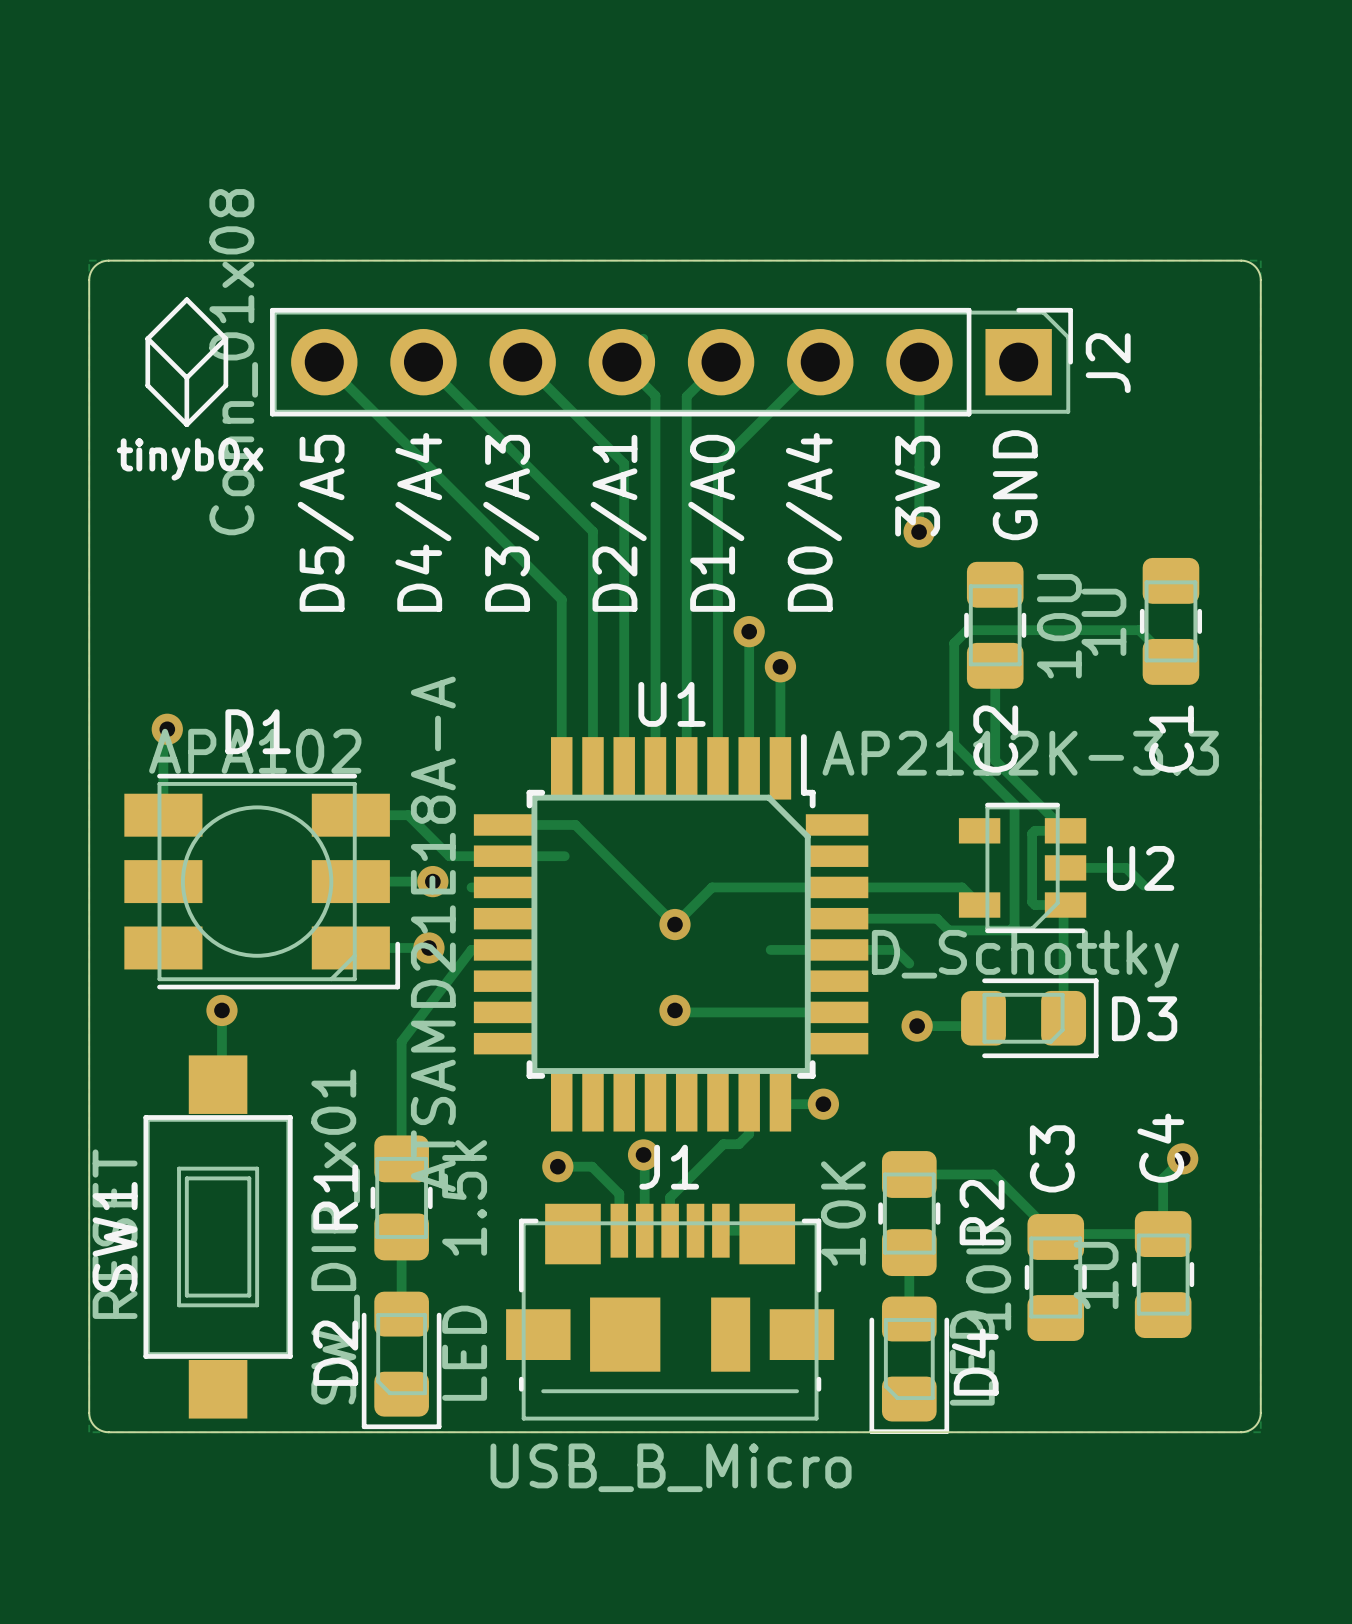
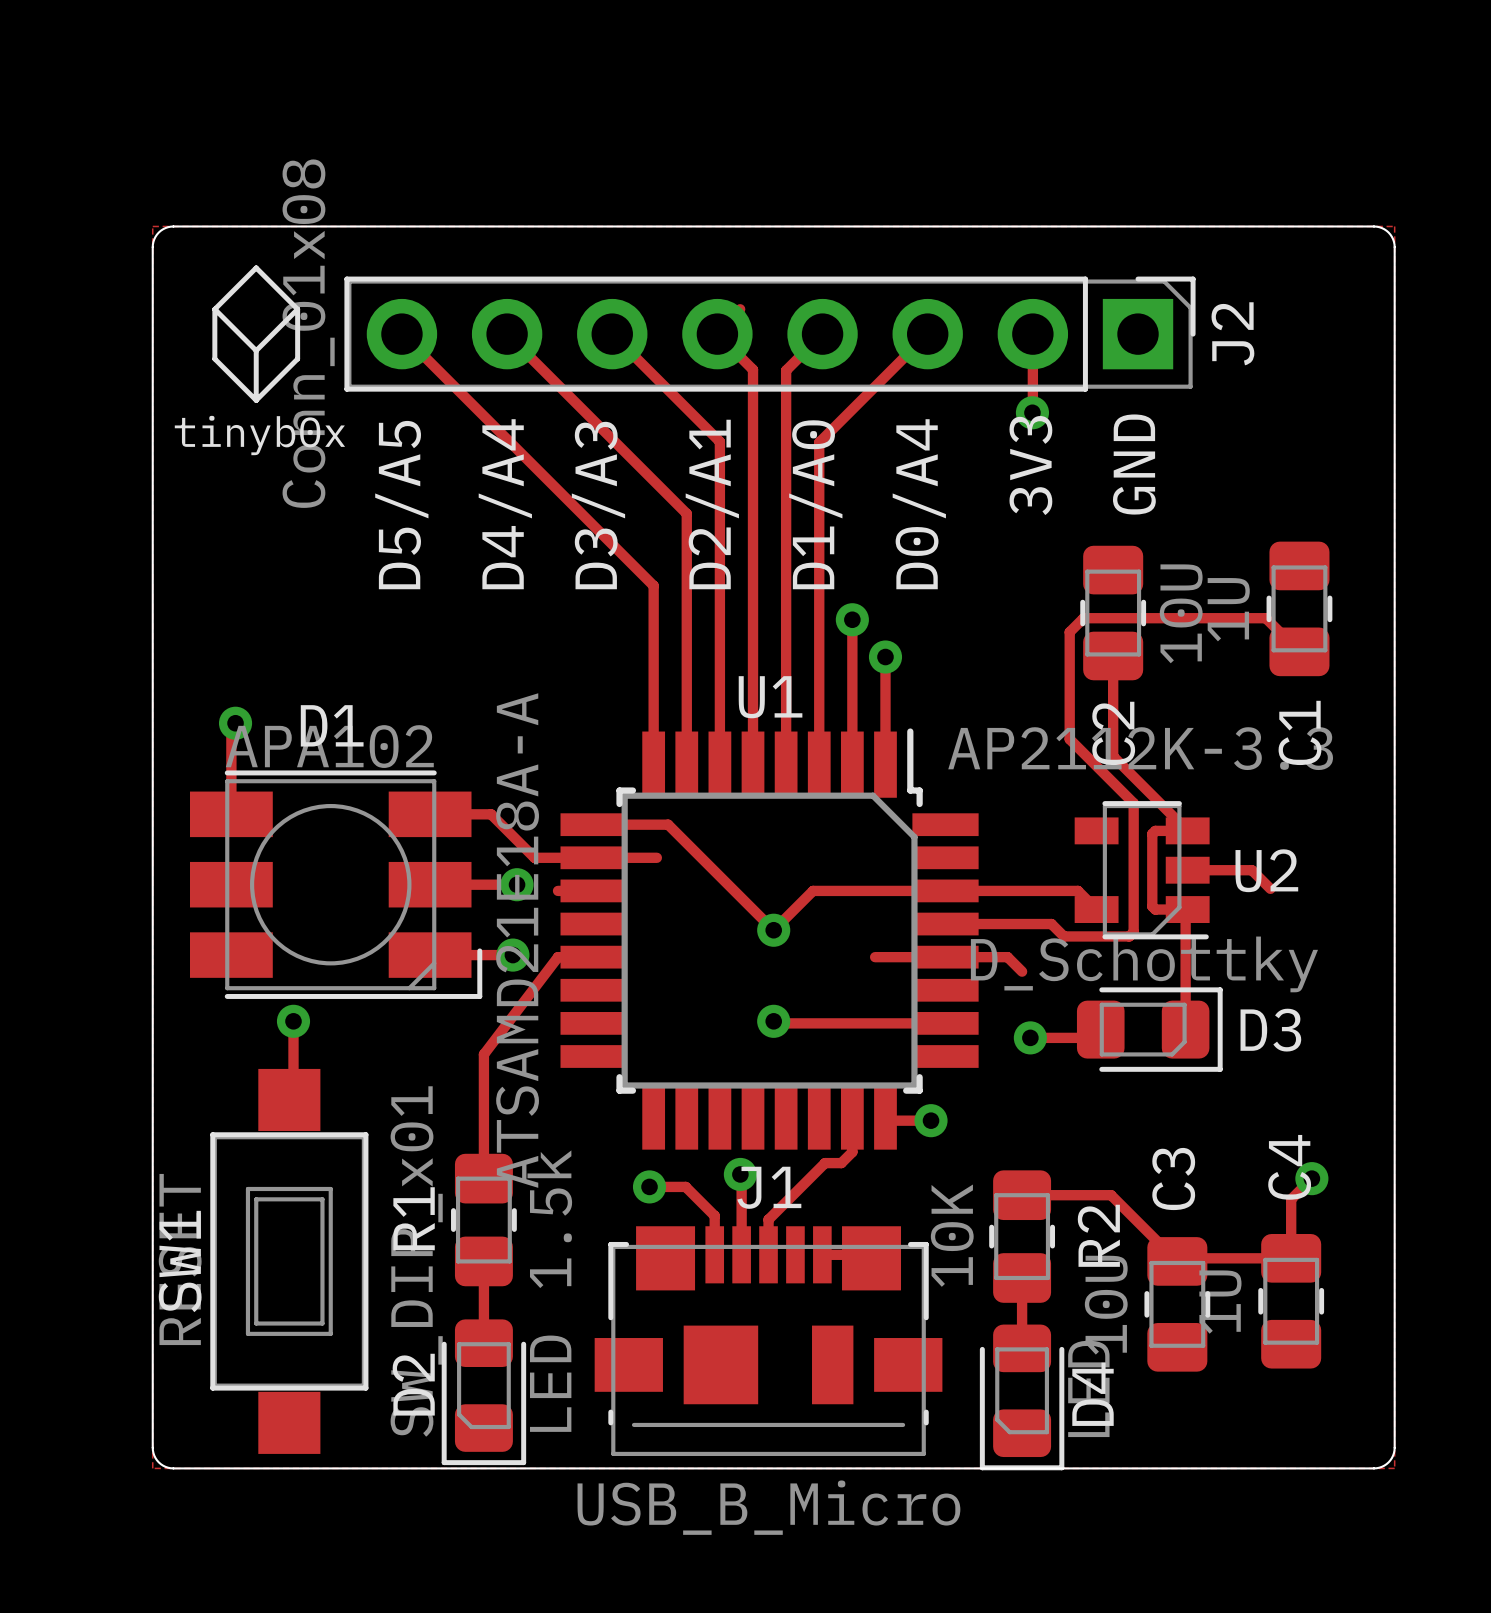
track: (919, 435) (919, 532) -> none
via position: (919, 532) -> (1032, 412)

